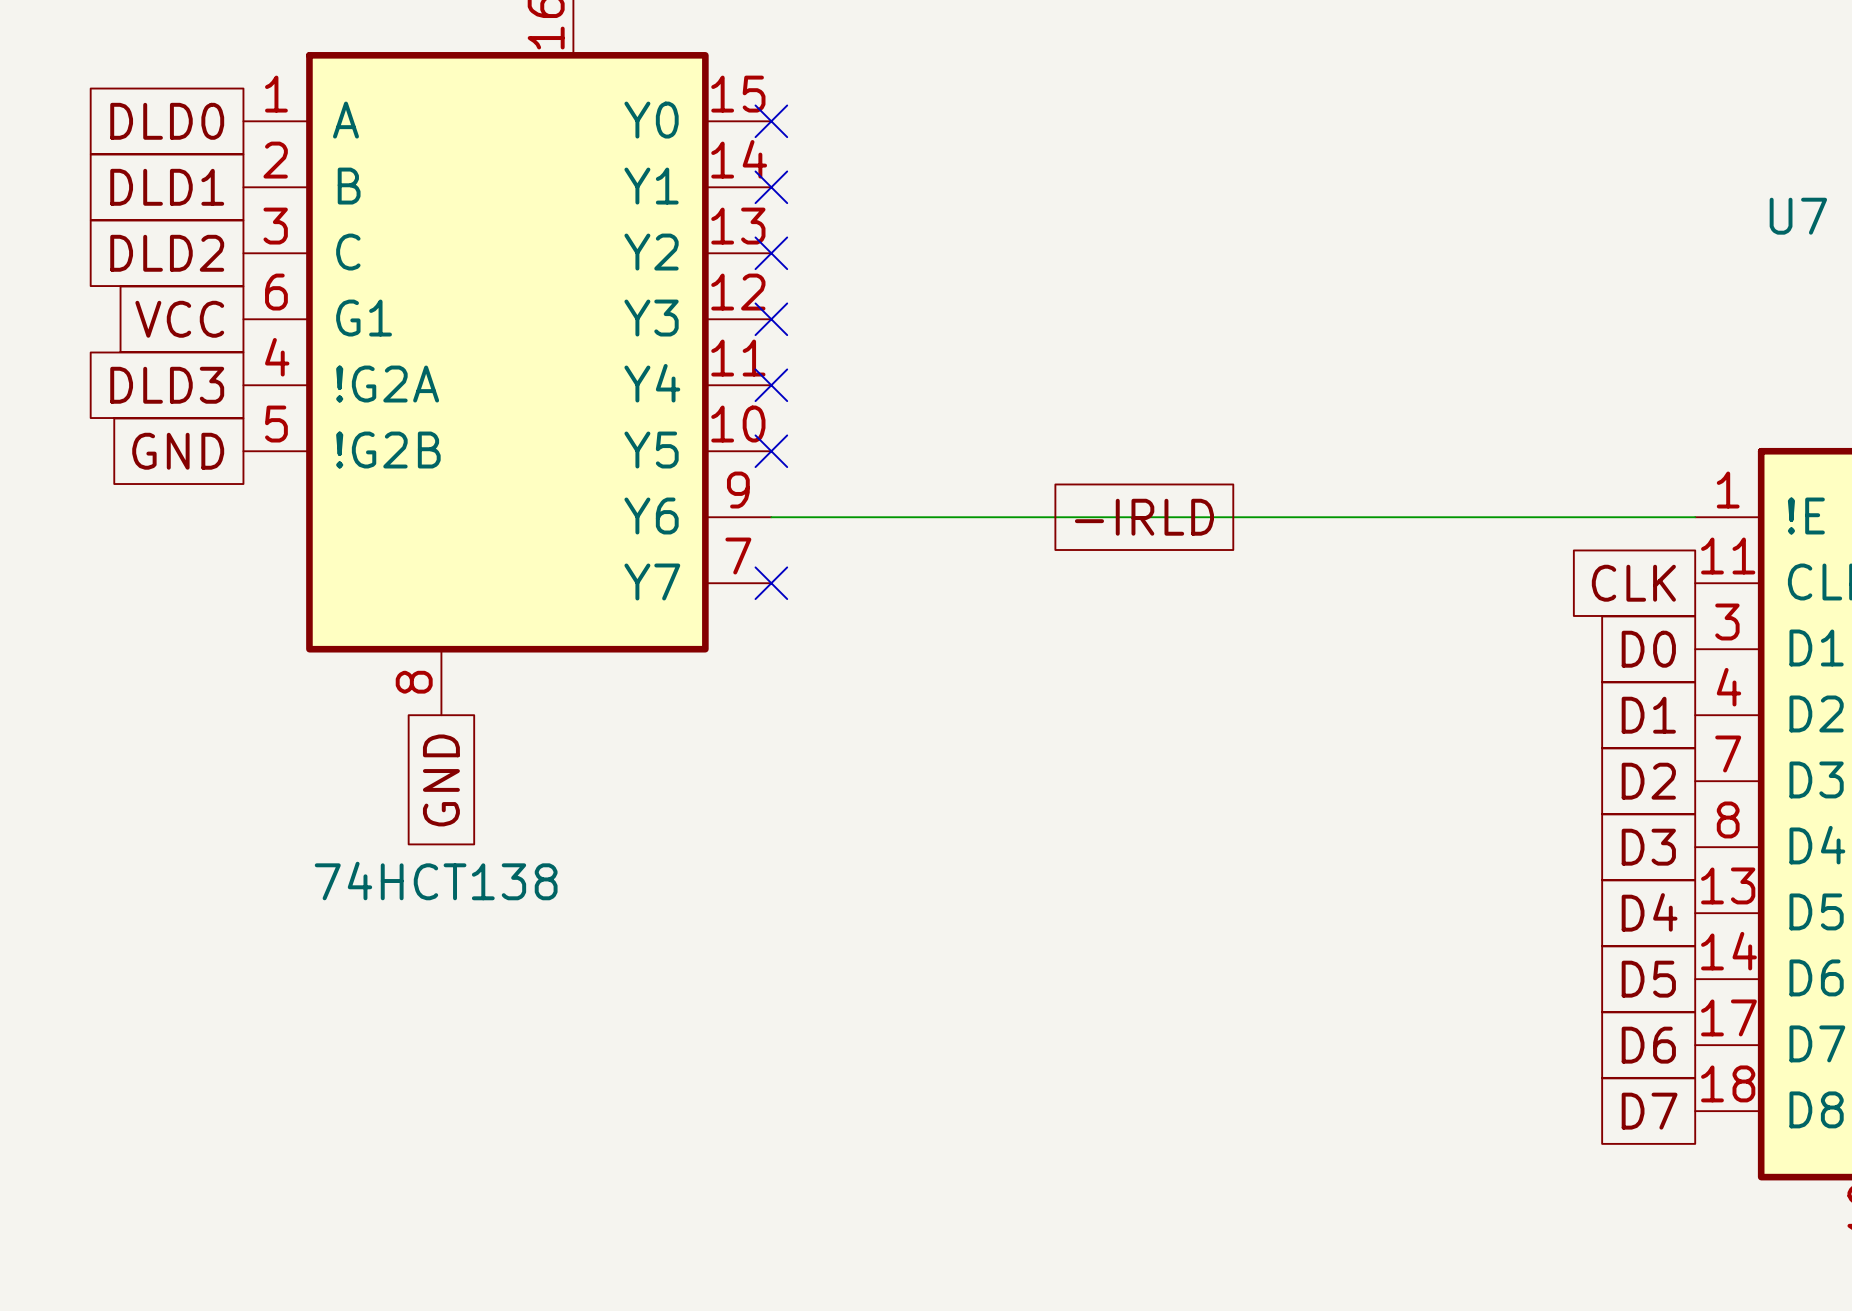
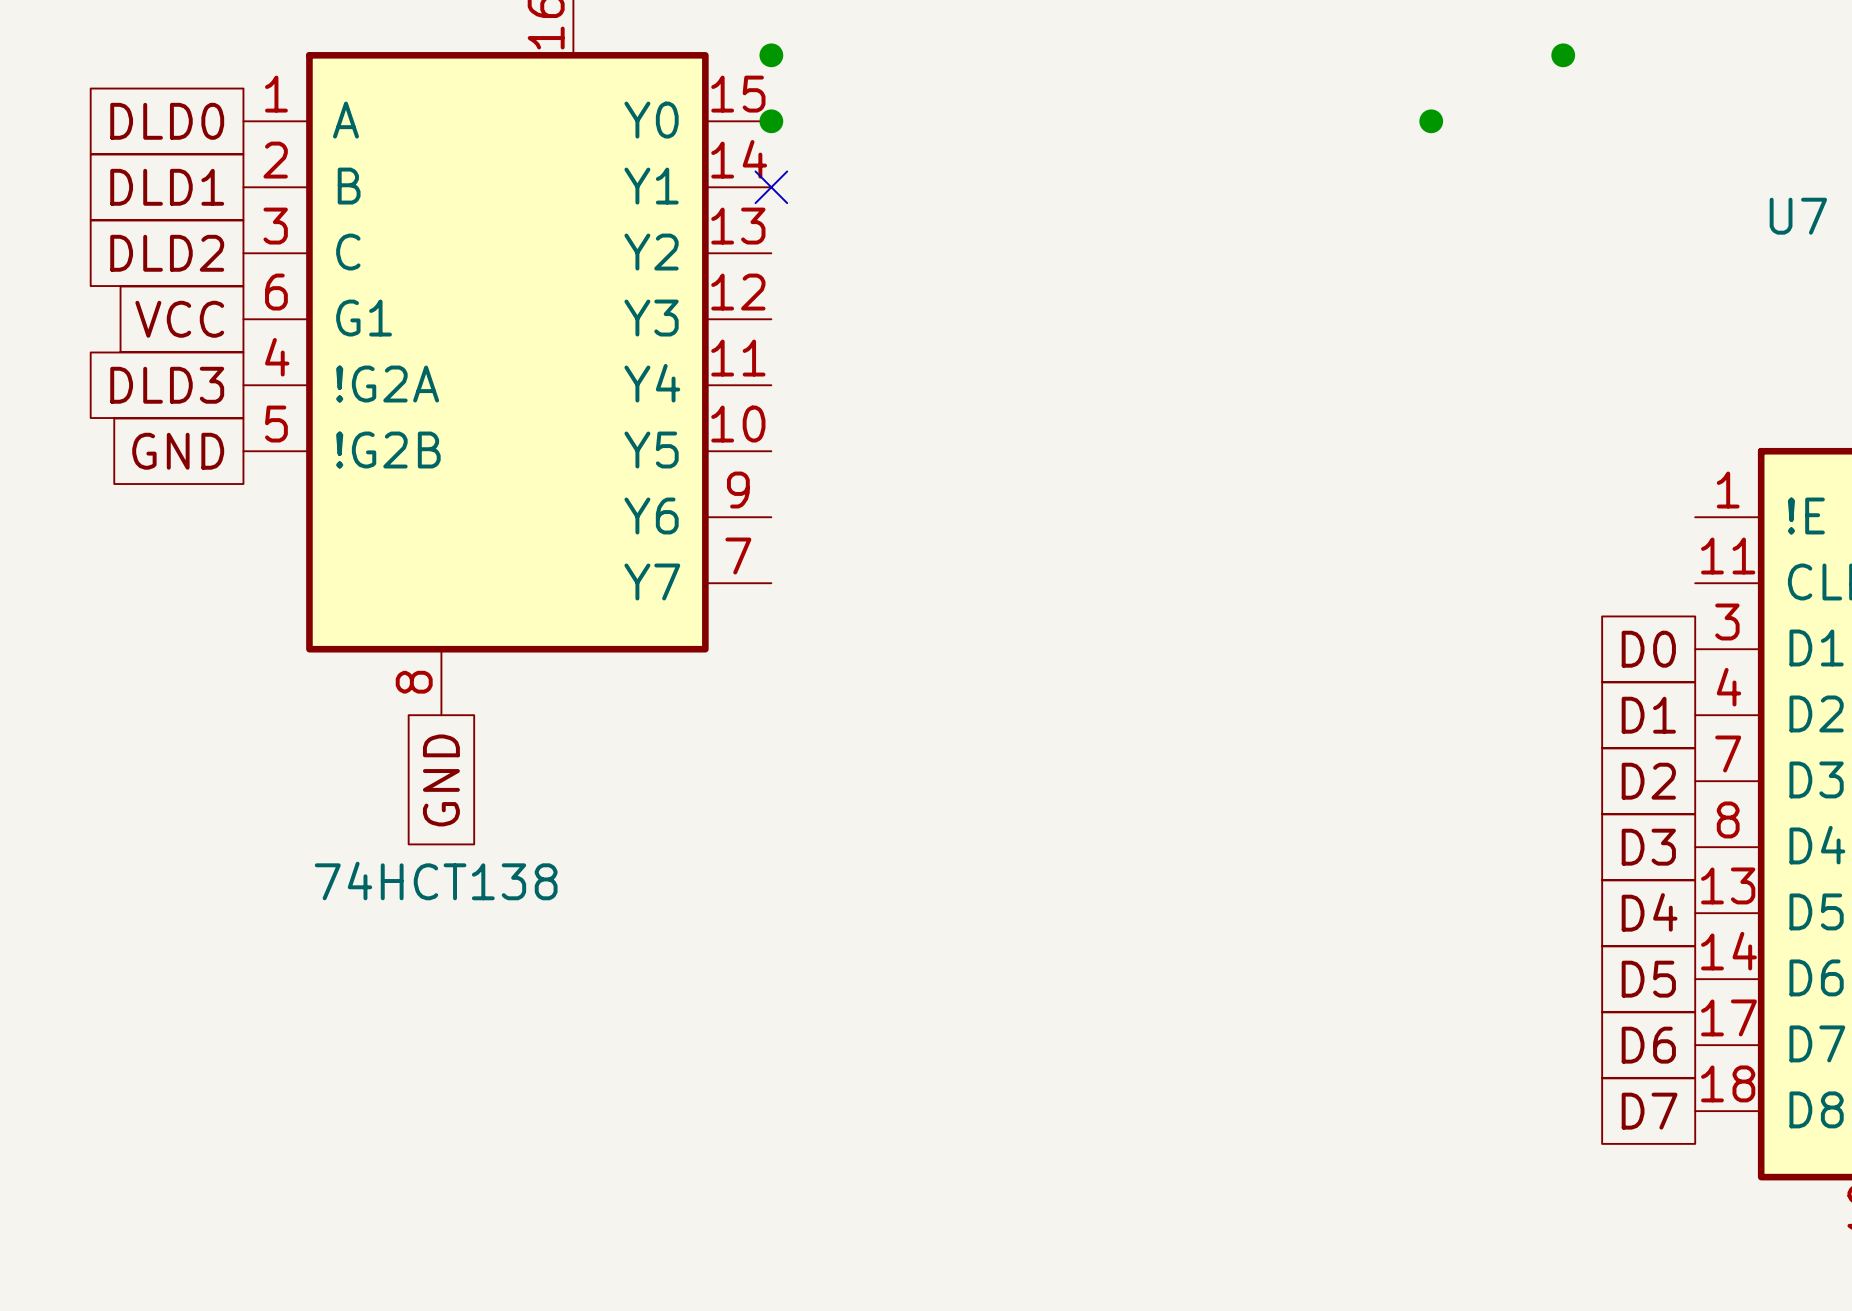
junction: none -> (771, 55)
junction: none -> (1563, 55)
no-connect mark: (771, 121) -> none
junction: none -> (771, 121)
junction: none -> (1431, 121)
no-connect mark: (771, 253) -> none
no-connect mark: (771, 319) -> none
no-connect mark: (771, 385) -> none
no-connect mark: (771, 451) -> none
wire: (771, 517) (1695, 517) -> none
global label: -IRLD (1144, 517) -> none
no-connect mark: (771, 583) -> none
global label: CLK (1633, 583) -> none

